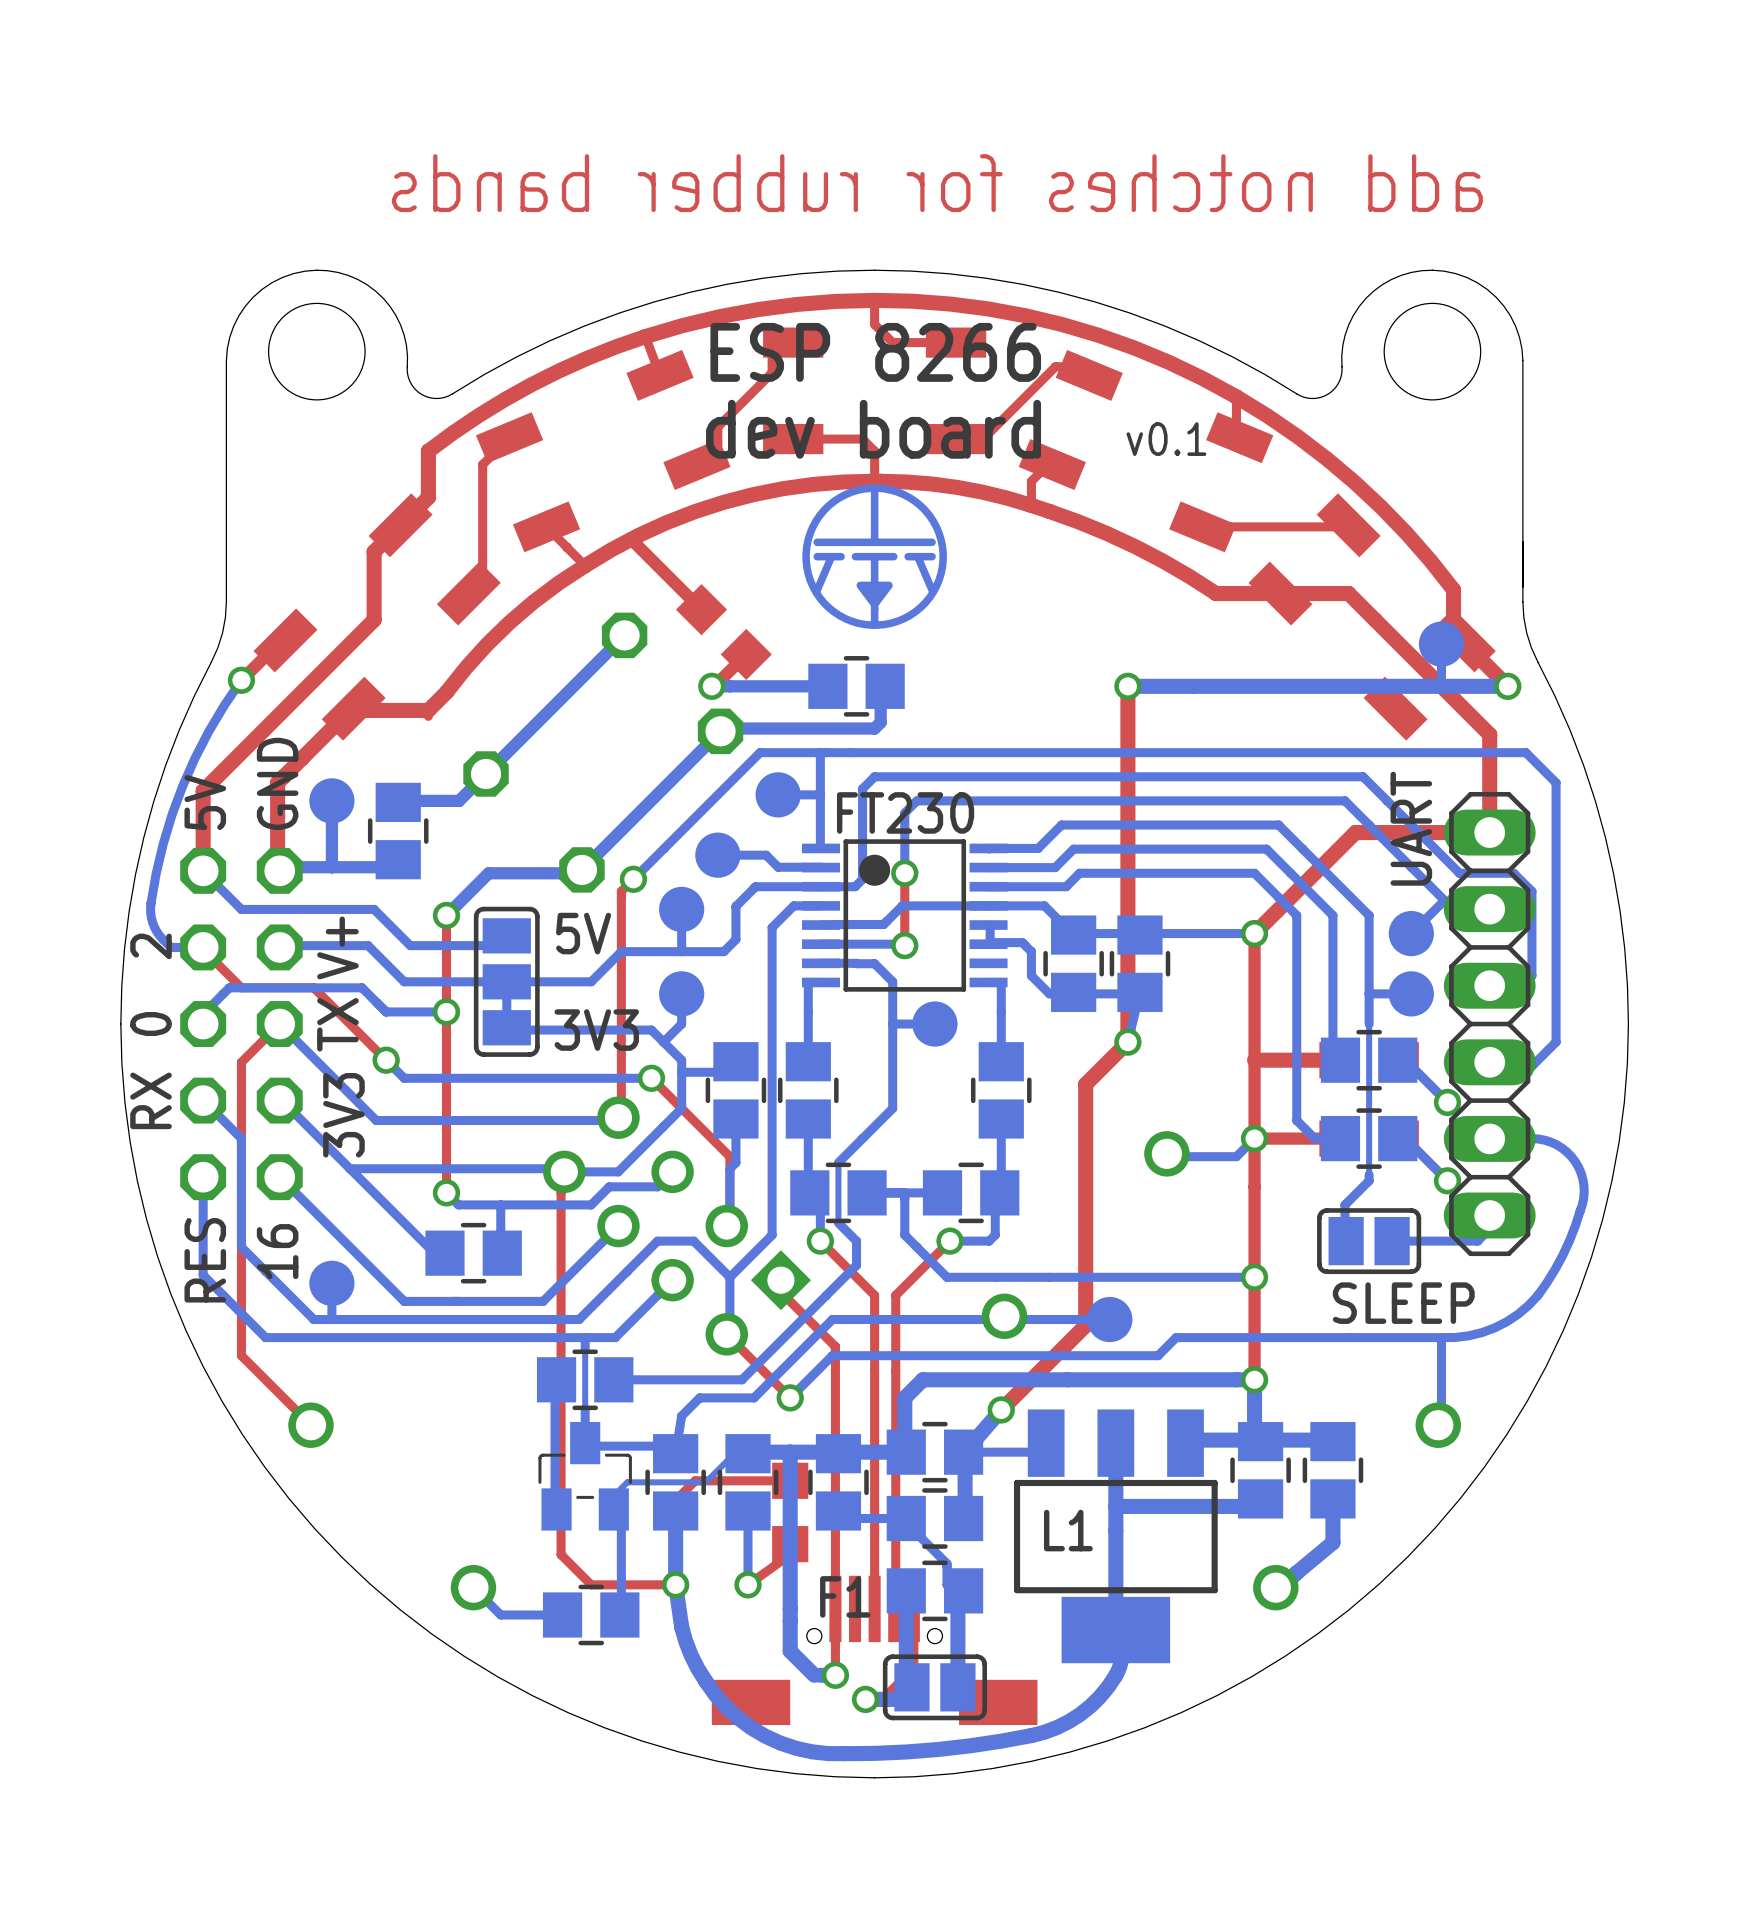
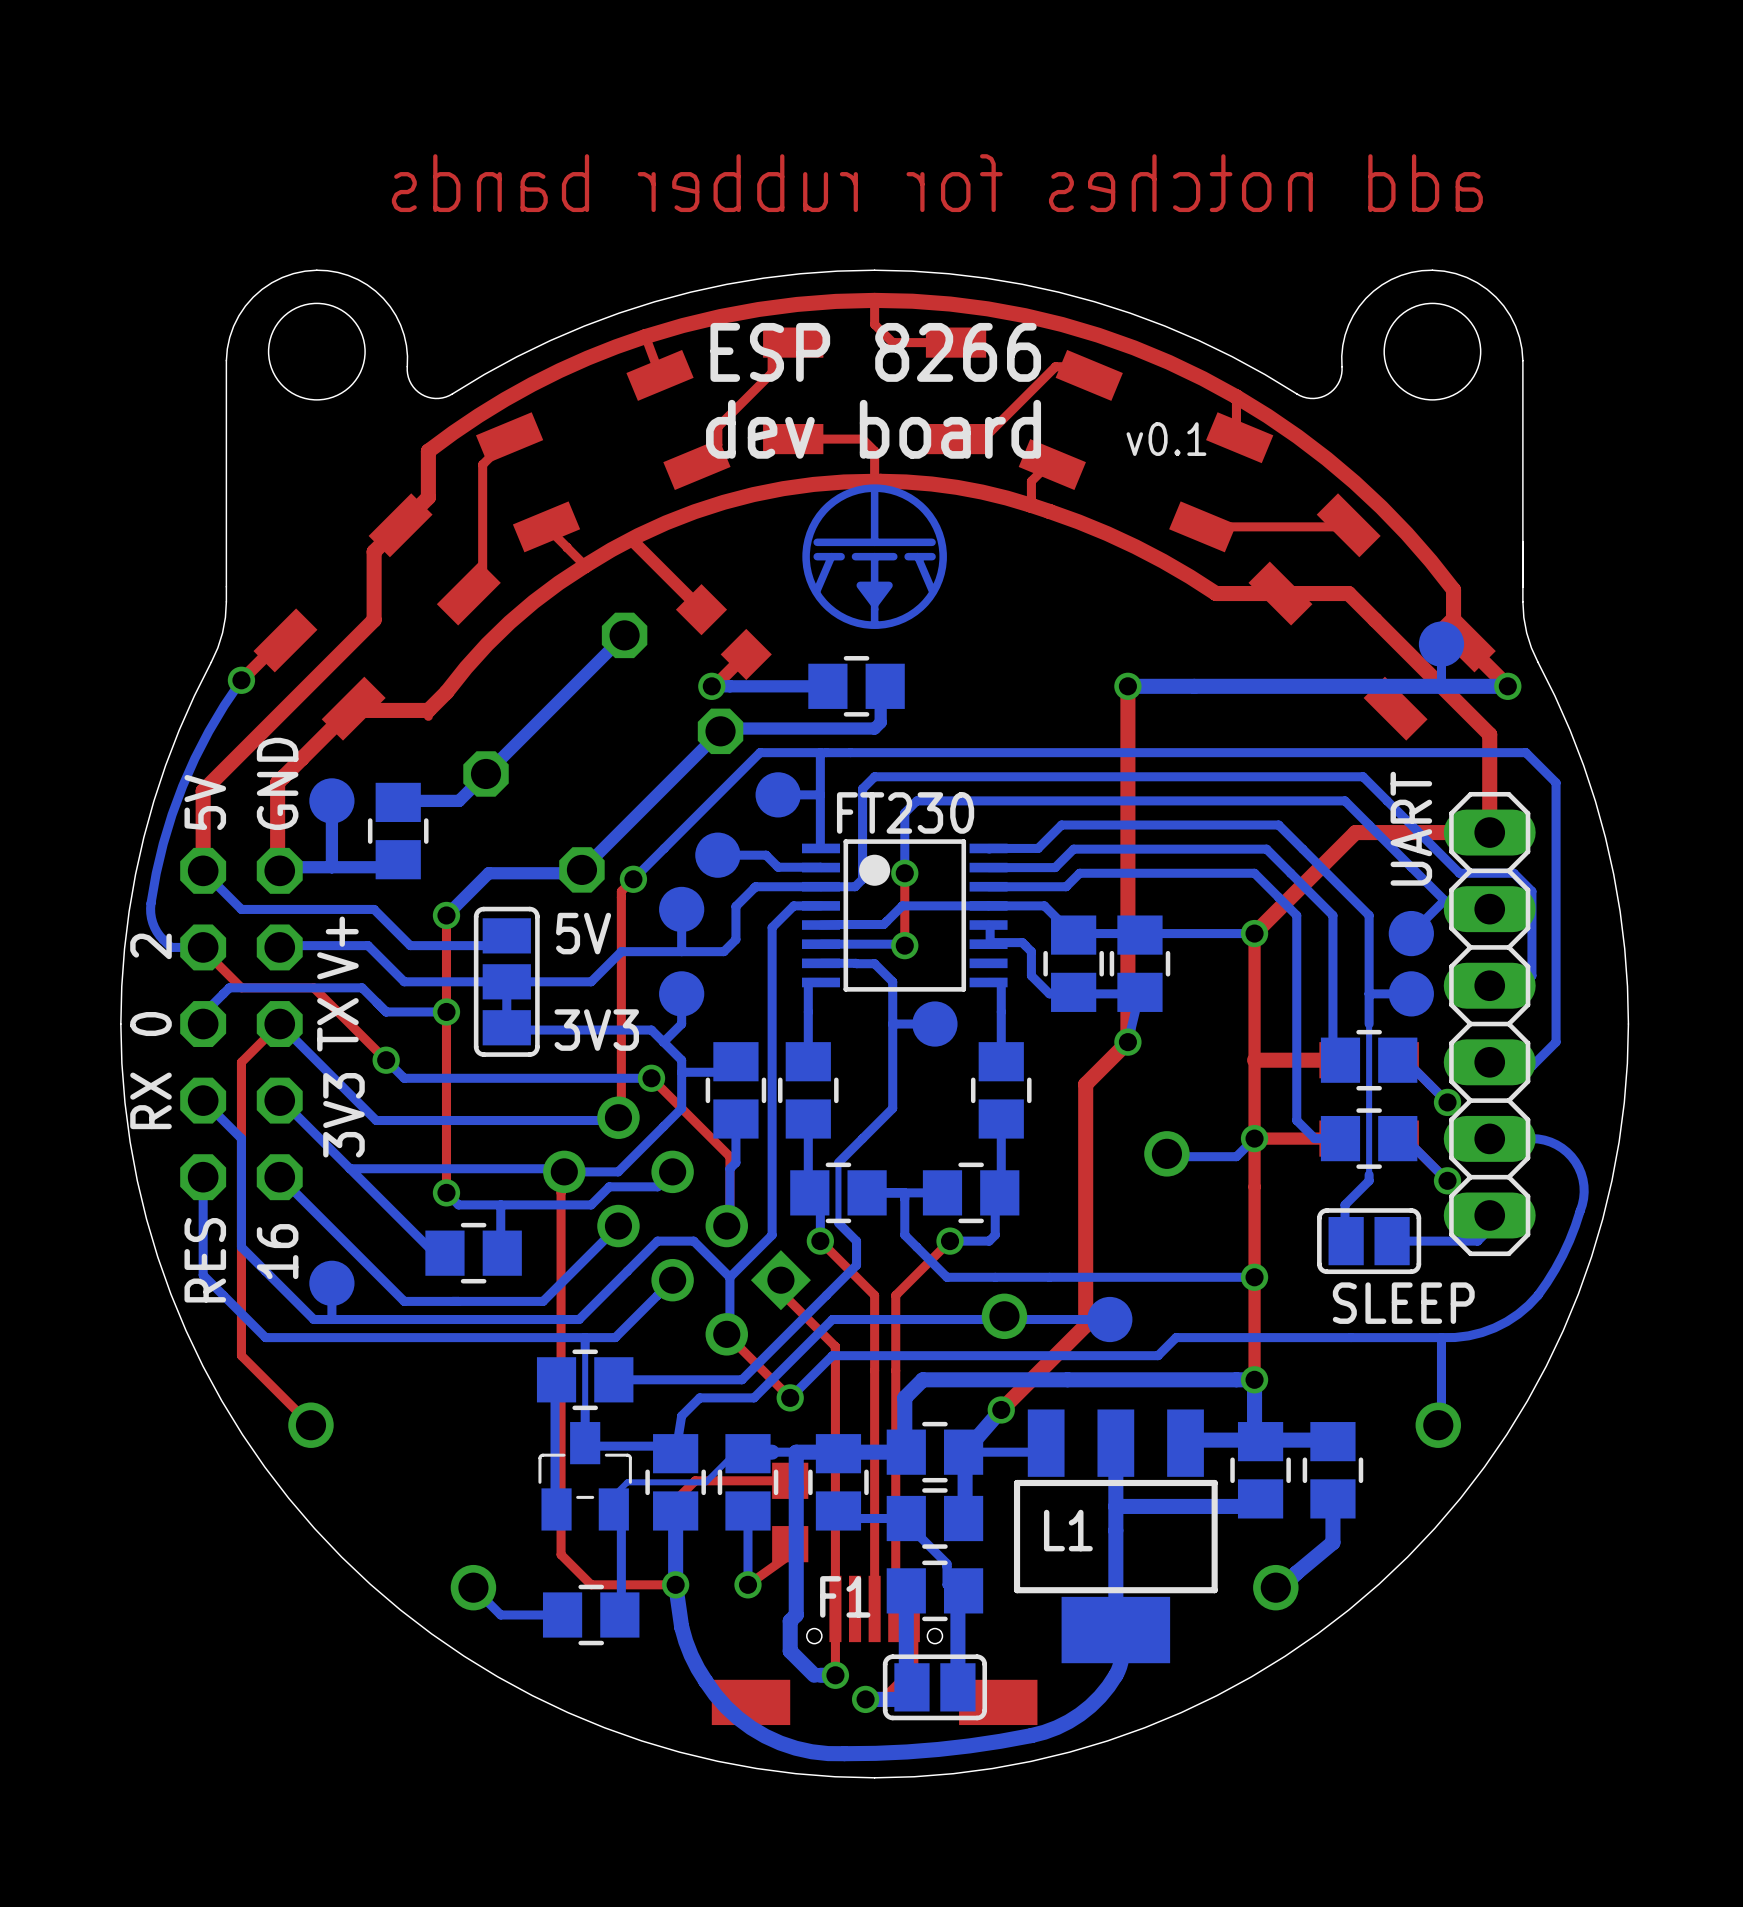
bottom track: (772, 1452) (790, 1452) (790, 1621) -> (796, 1452) (796, 1614) (790, 1621)

